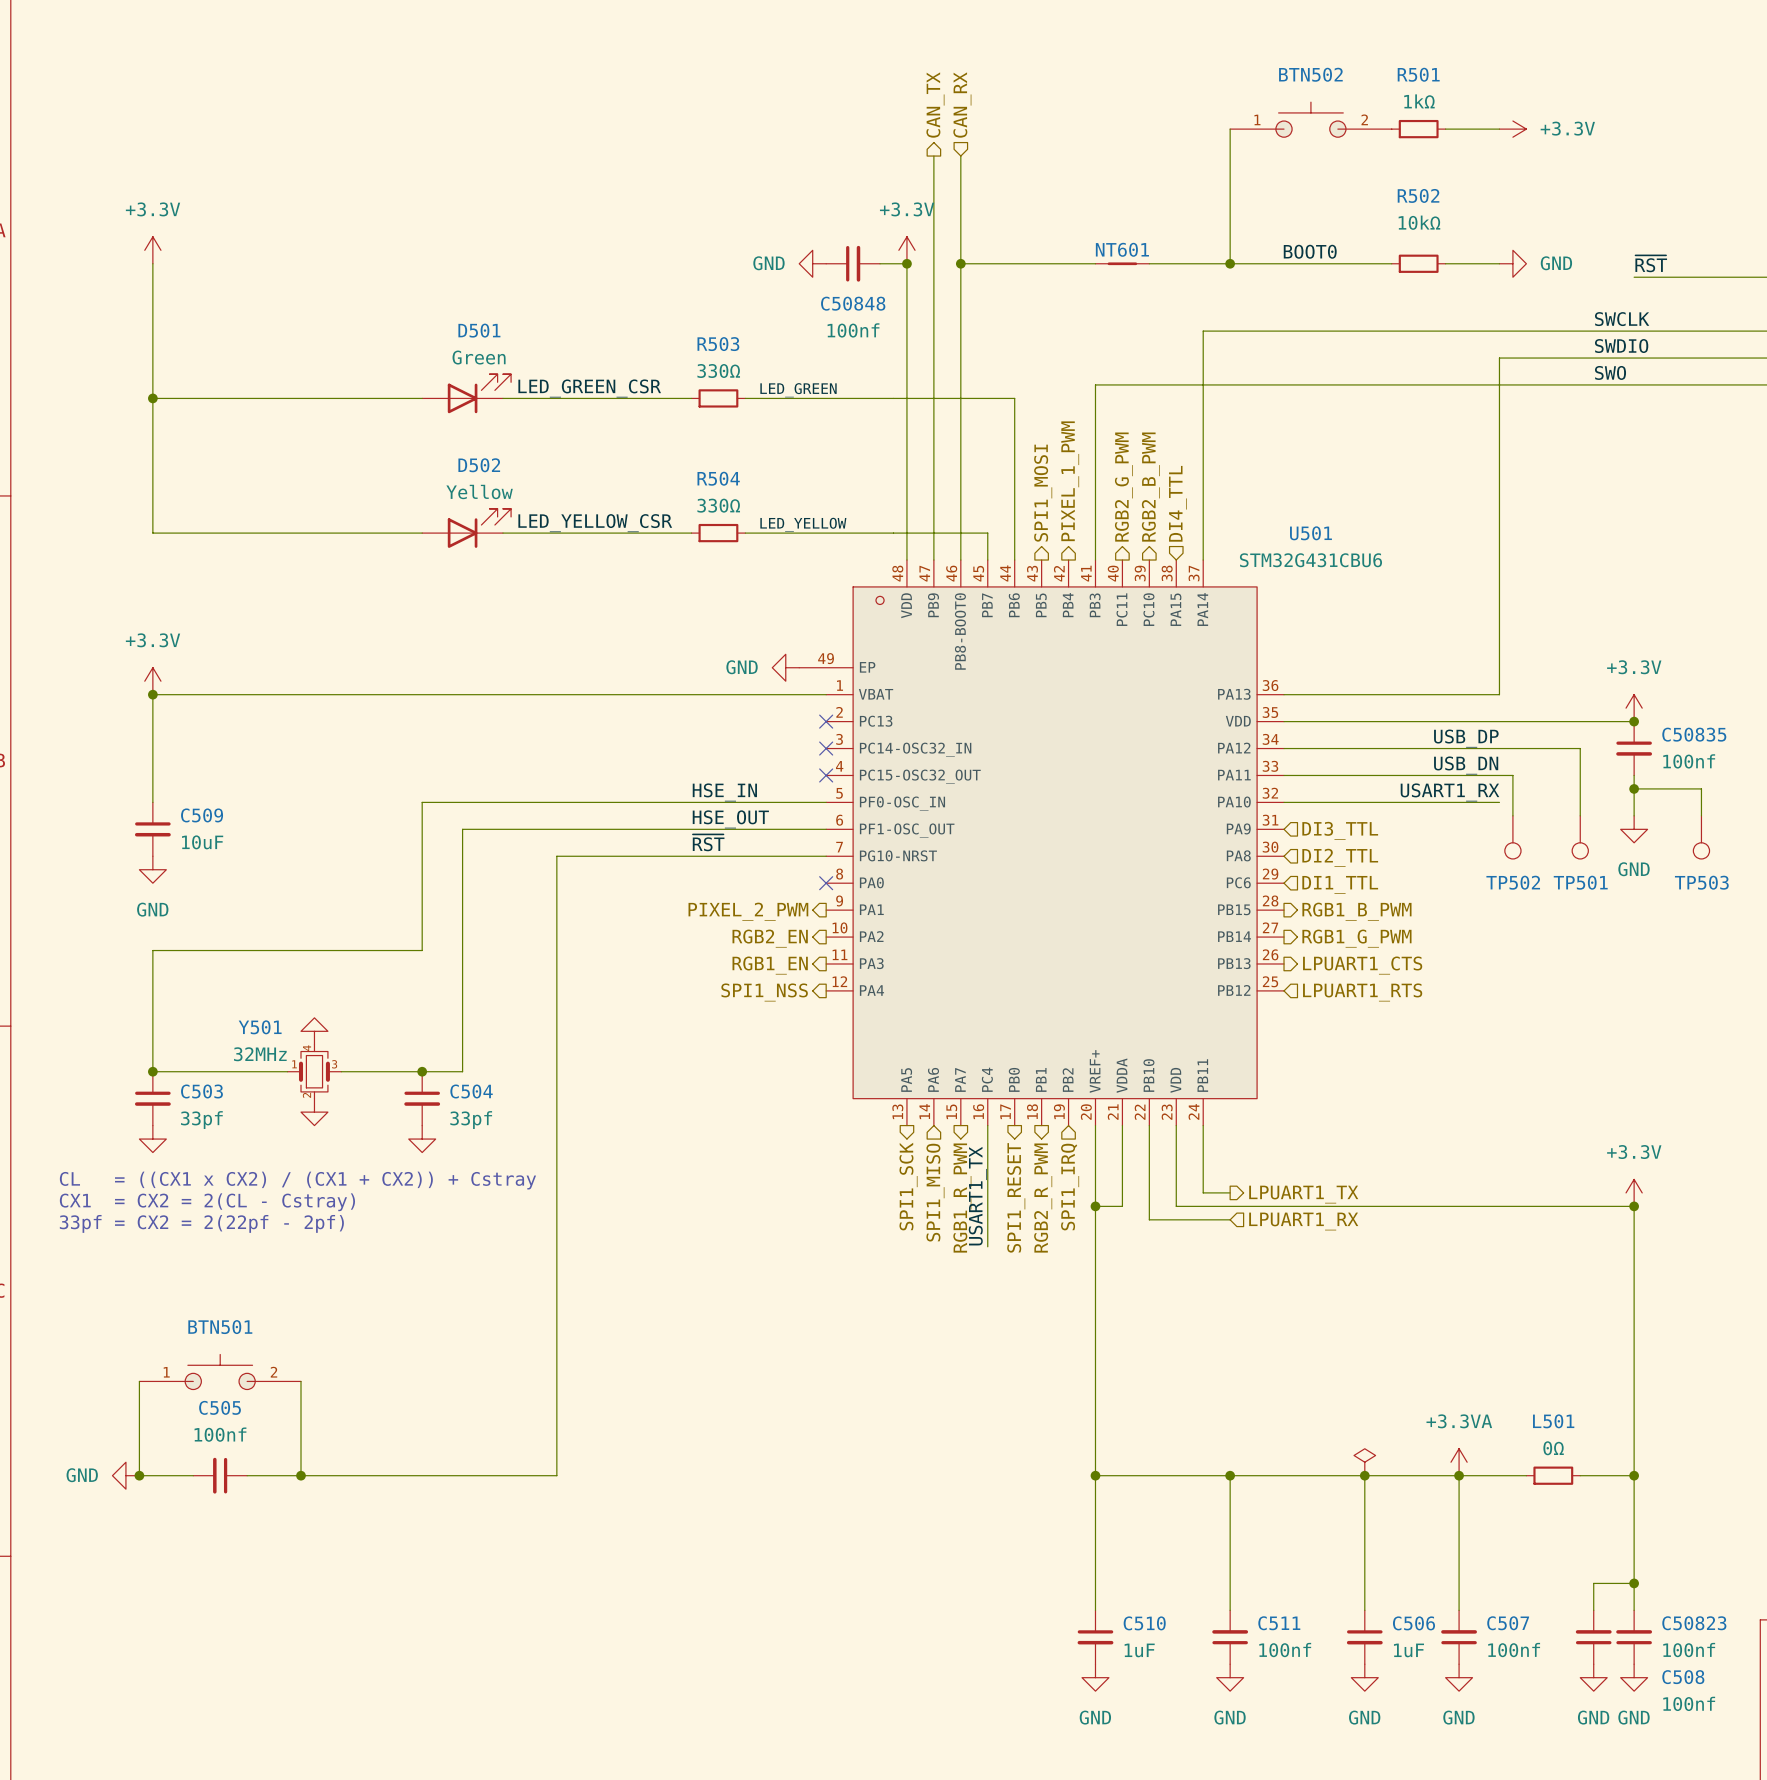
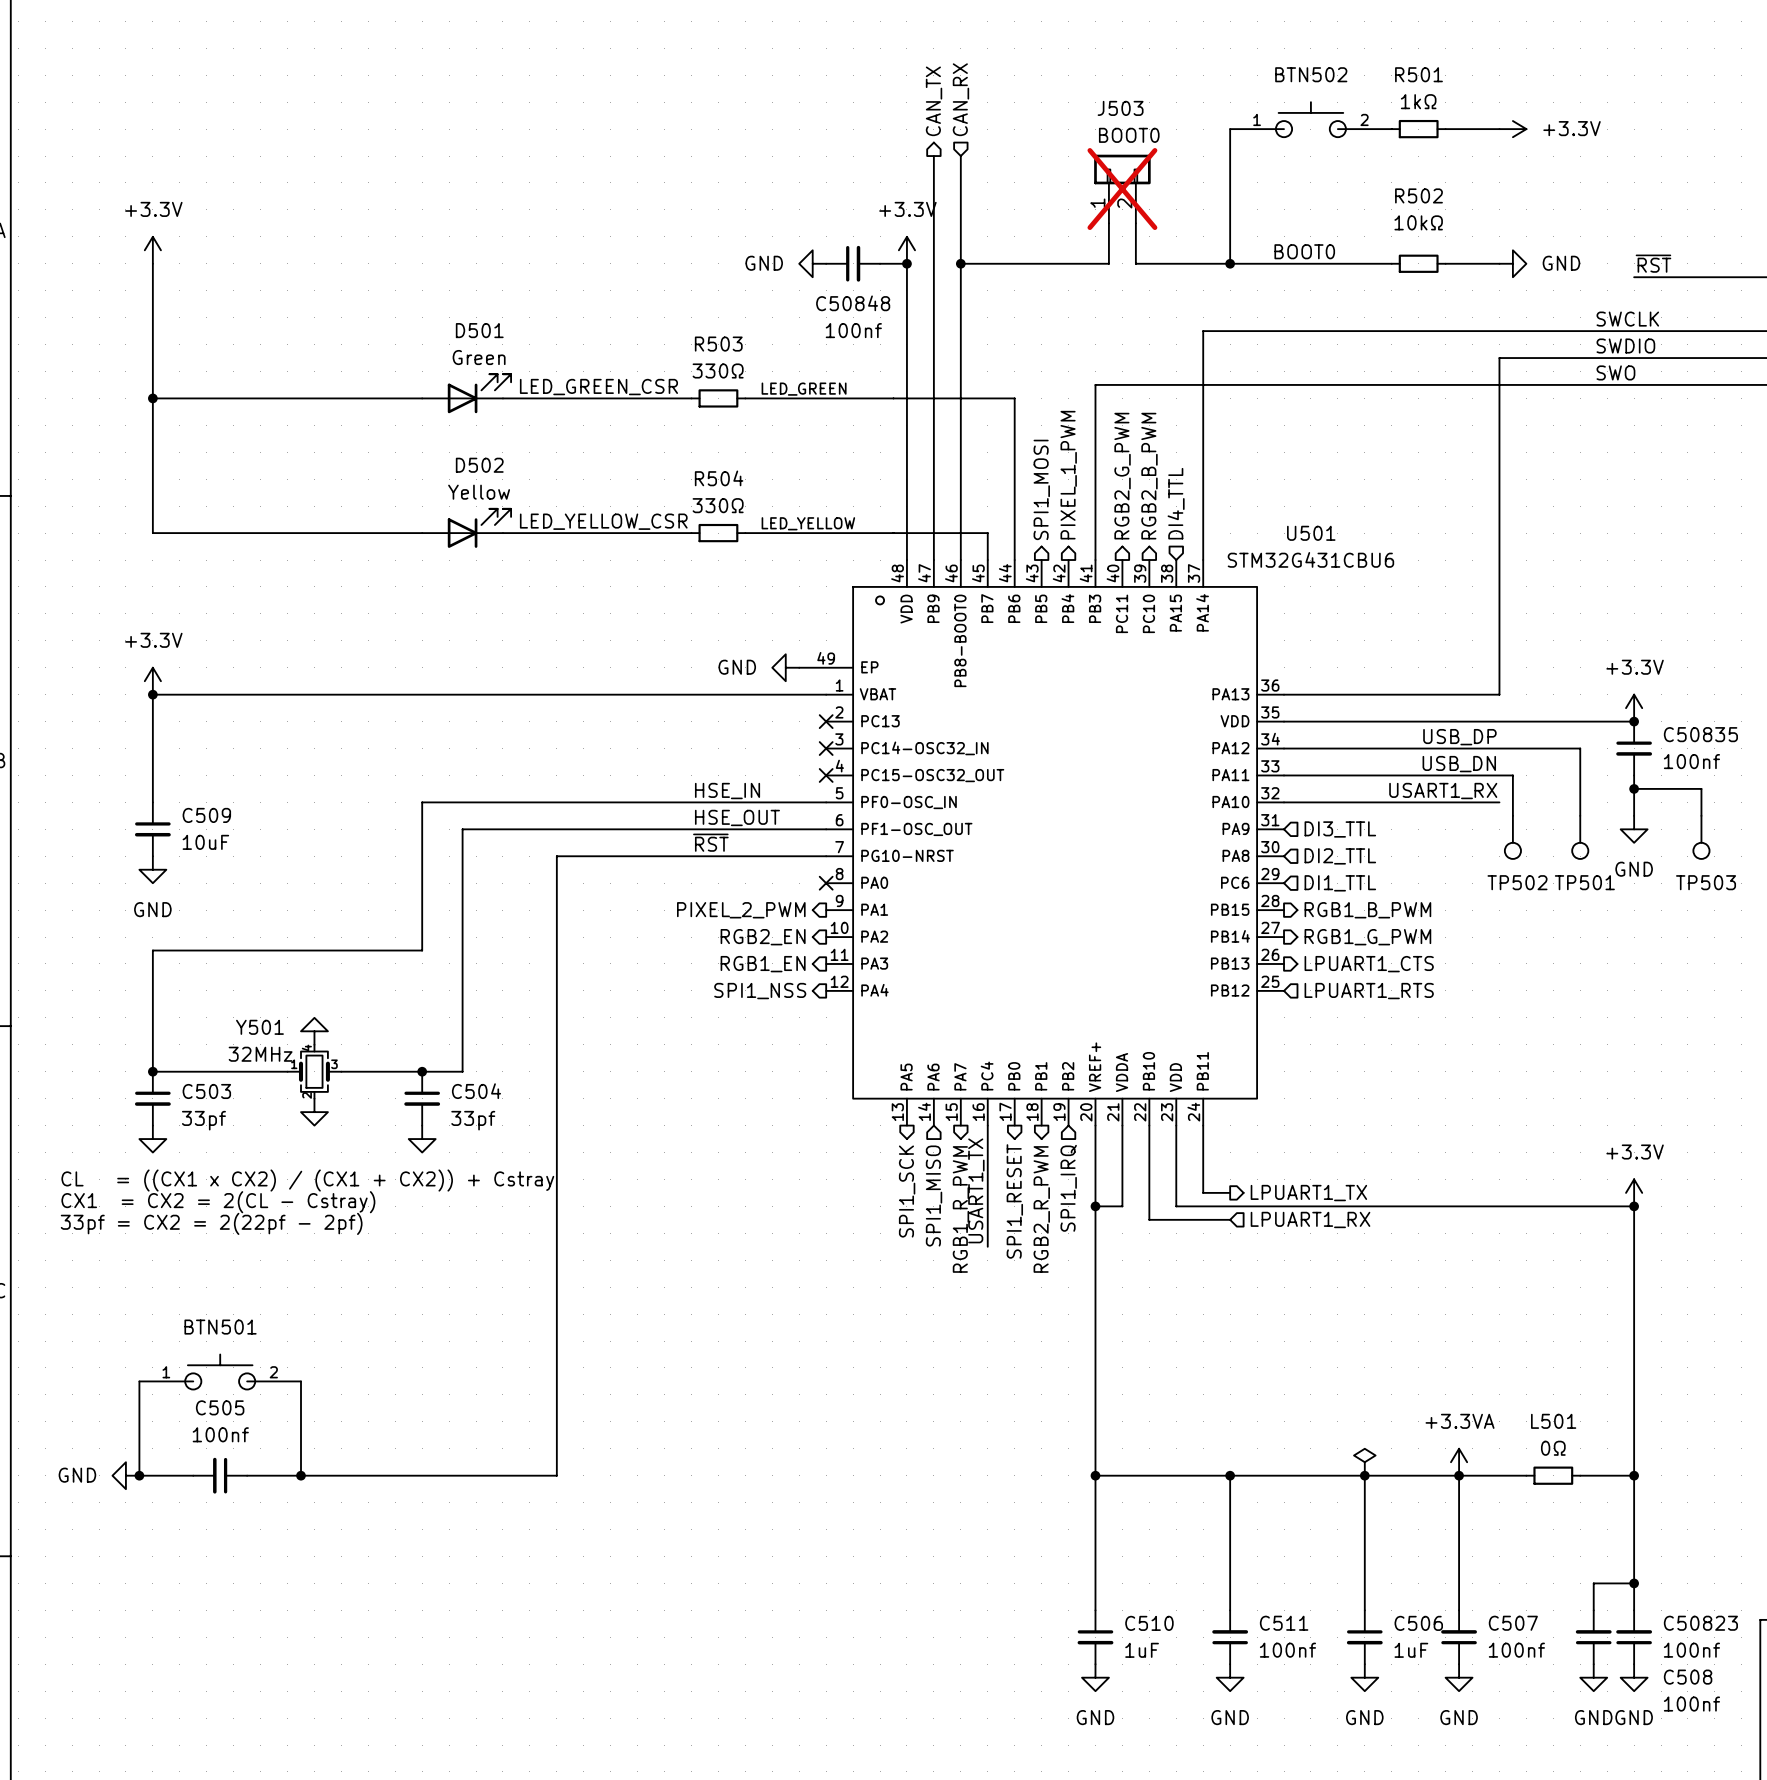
J503: none -> BOOT0 (1122, 189)
wire: none -> (1108, 223) (1108, 263) (1095, 263)
wire: none -> (1135, 223) (1135, 263) (1149, 263)
NT601: (1122, 263) -> none

